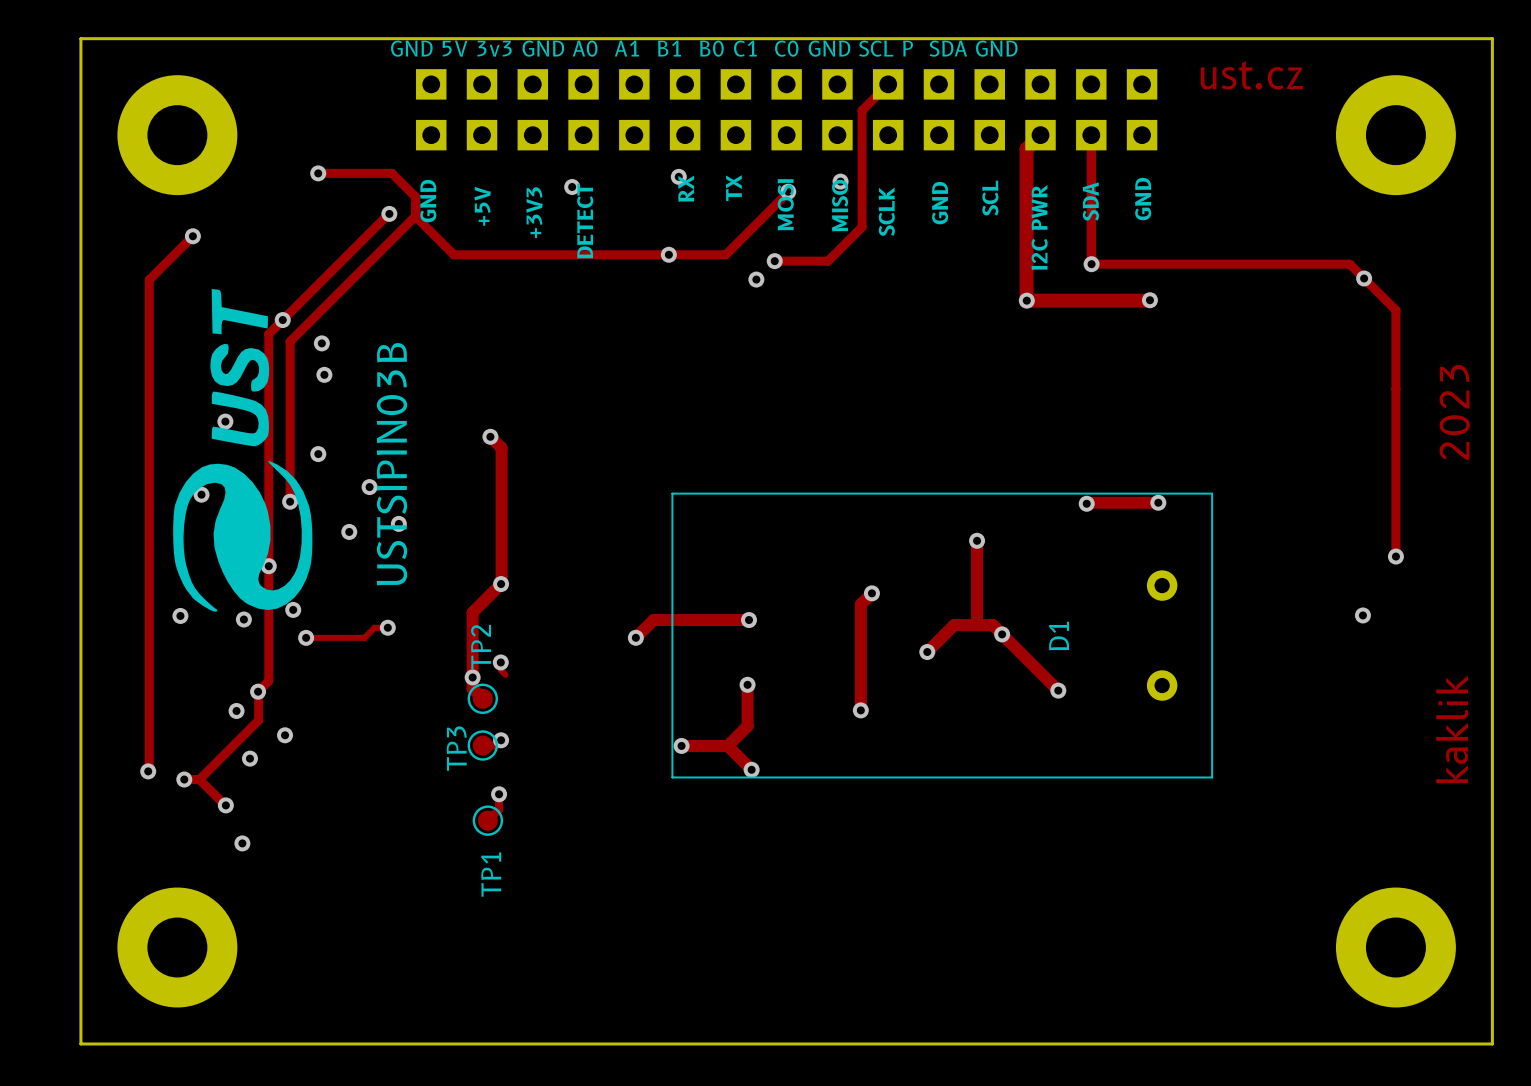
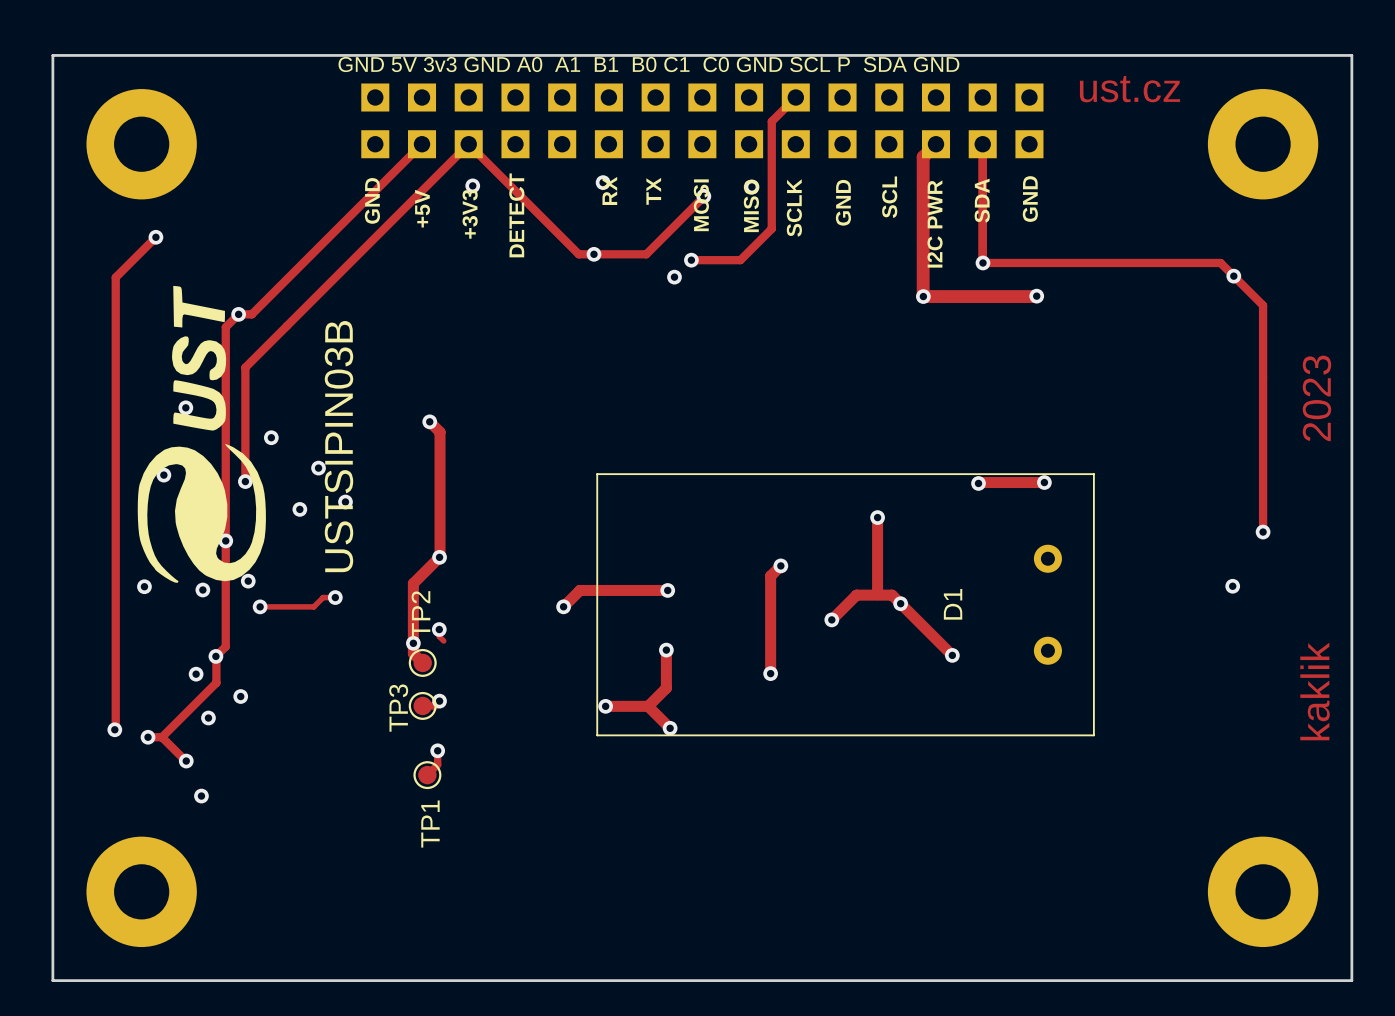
track: (318, 173) (392, 173) (415, 197) (415, 217) -> none
via: (318, 173) -> none
via position: (572, 187) -> (472, 185)
track: (389, 213) (282, 320) -> (422, 144) (251, 314) (238, 314)
via: (389, 213) -> none
track: (415, 215) (290, 341) (290, 377) -> none
track: (415, 216) (453, 254) (652, 254) -> (245, 367) (468, 144) (578, 254)
via: (321, 343) -> none
via: (324, 374) -> none

